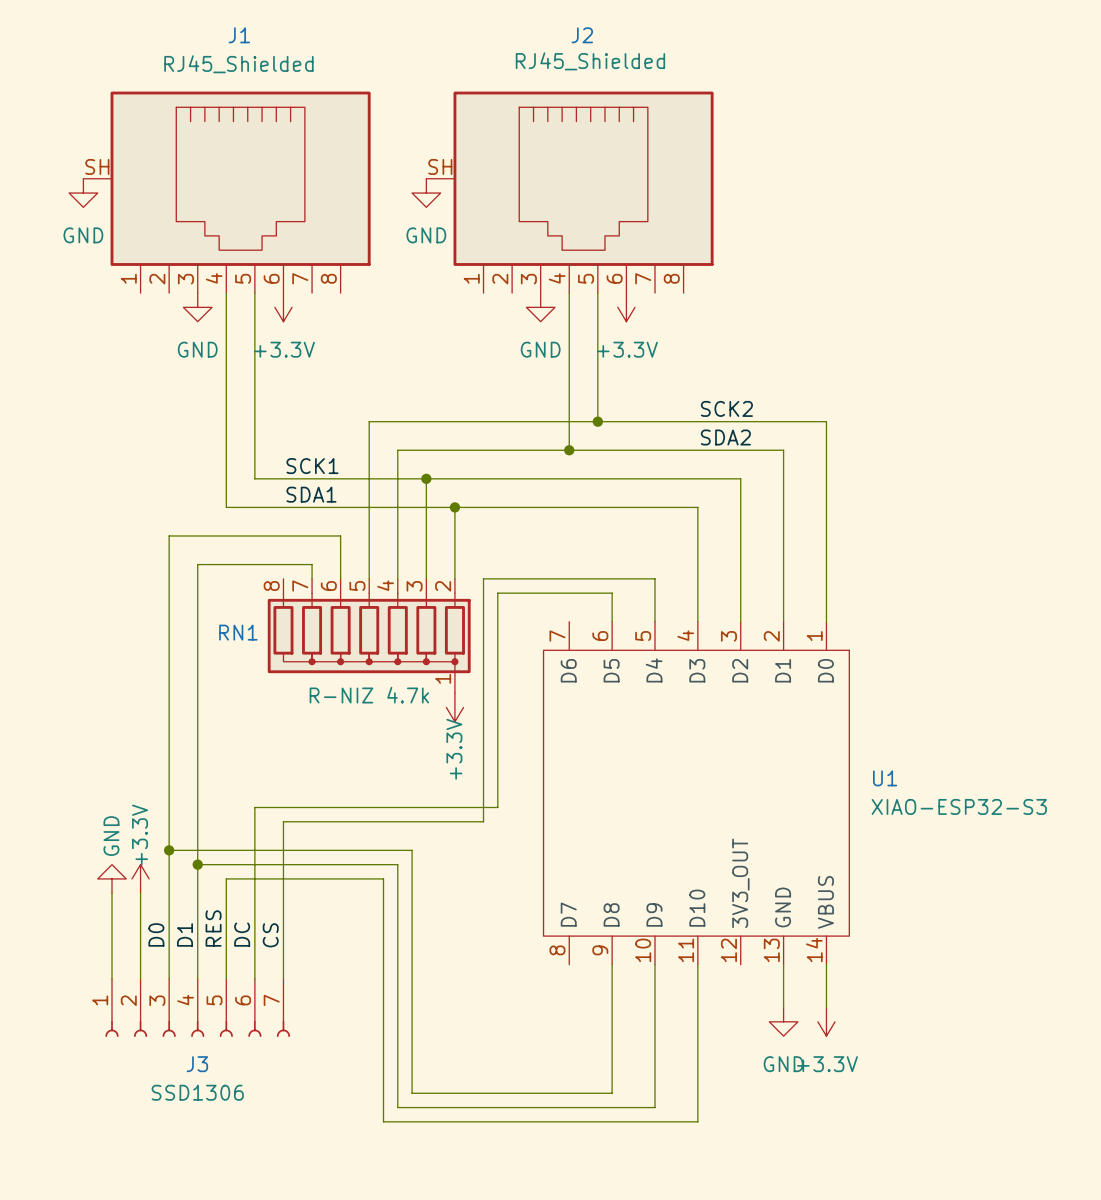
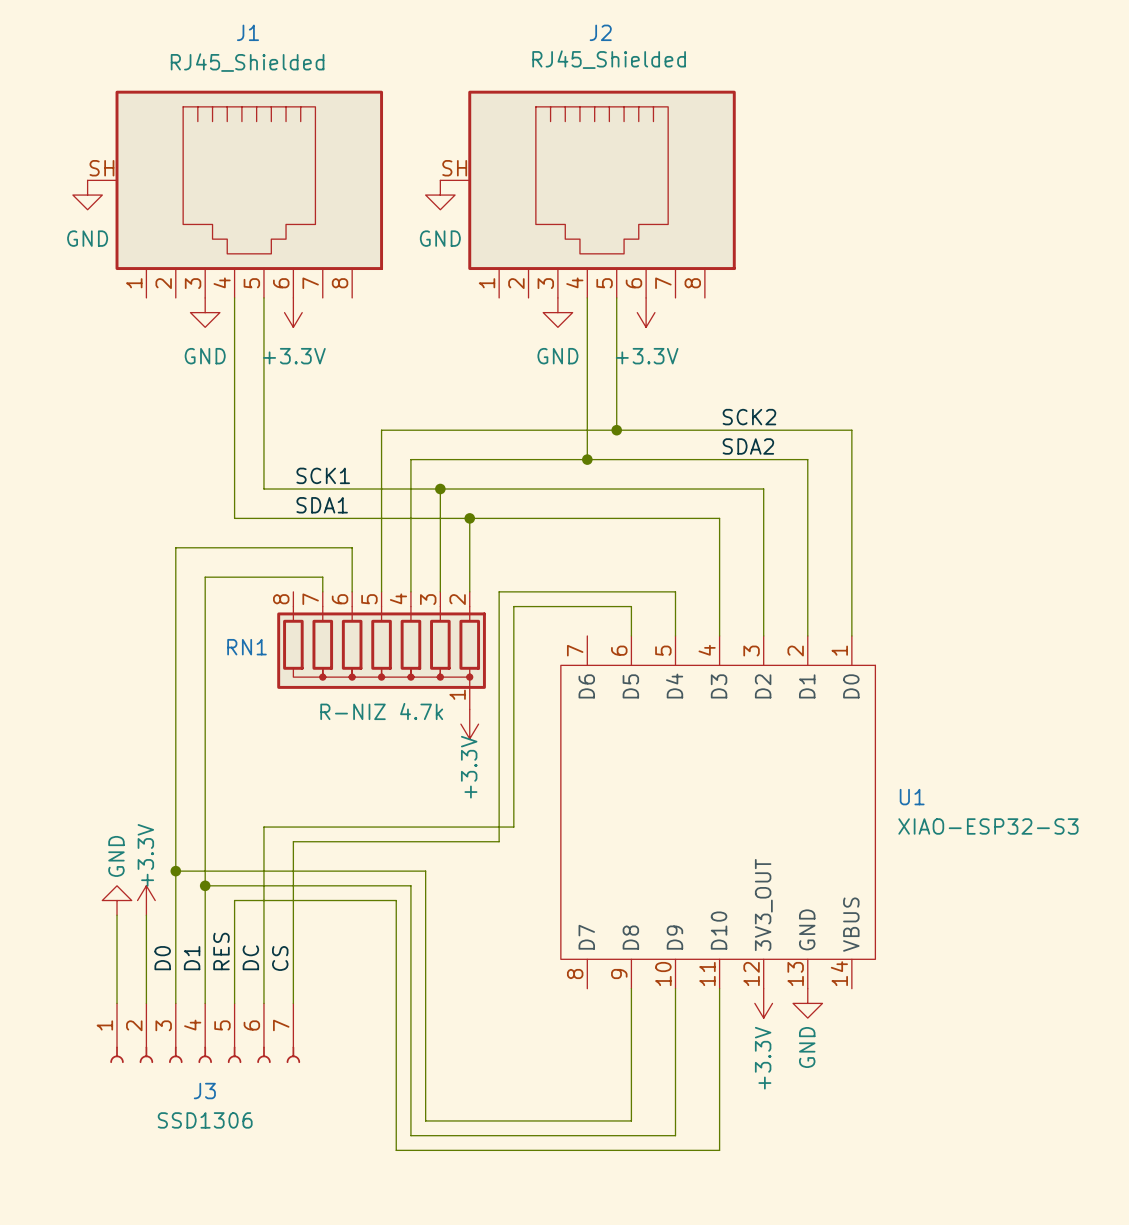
wire: (783, 964) (783, 1007) -> none
wire: (826, 964) (826, 1007) -> none
power symbol position: GND (783, 1021) -> GND (807, 1003)
power symbol position: +3.3V (826, 1021) -> +3.3V (763, 1003)
power symbol text rotation: 0° (783, 1064) -> 90° counterclockwise (807, 1047)
power symbol text rotation: 0° (827, 1064) -> 90° counterclockwise (763, 1058)

